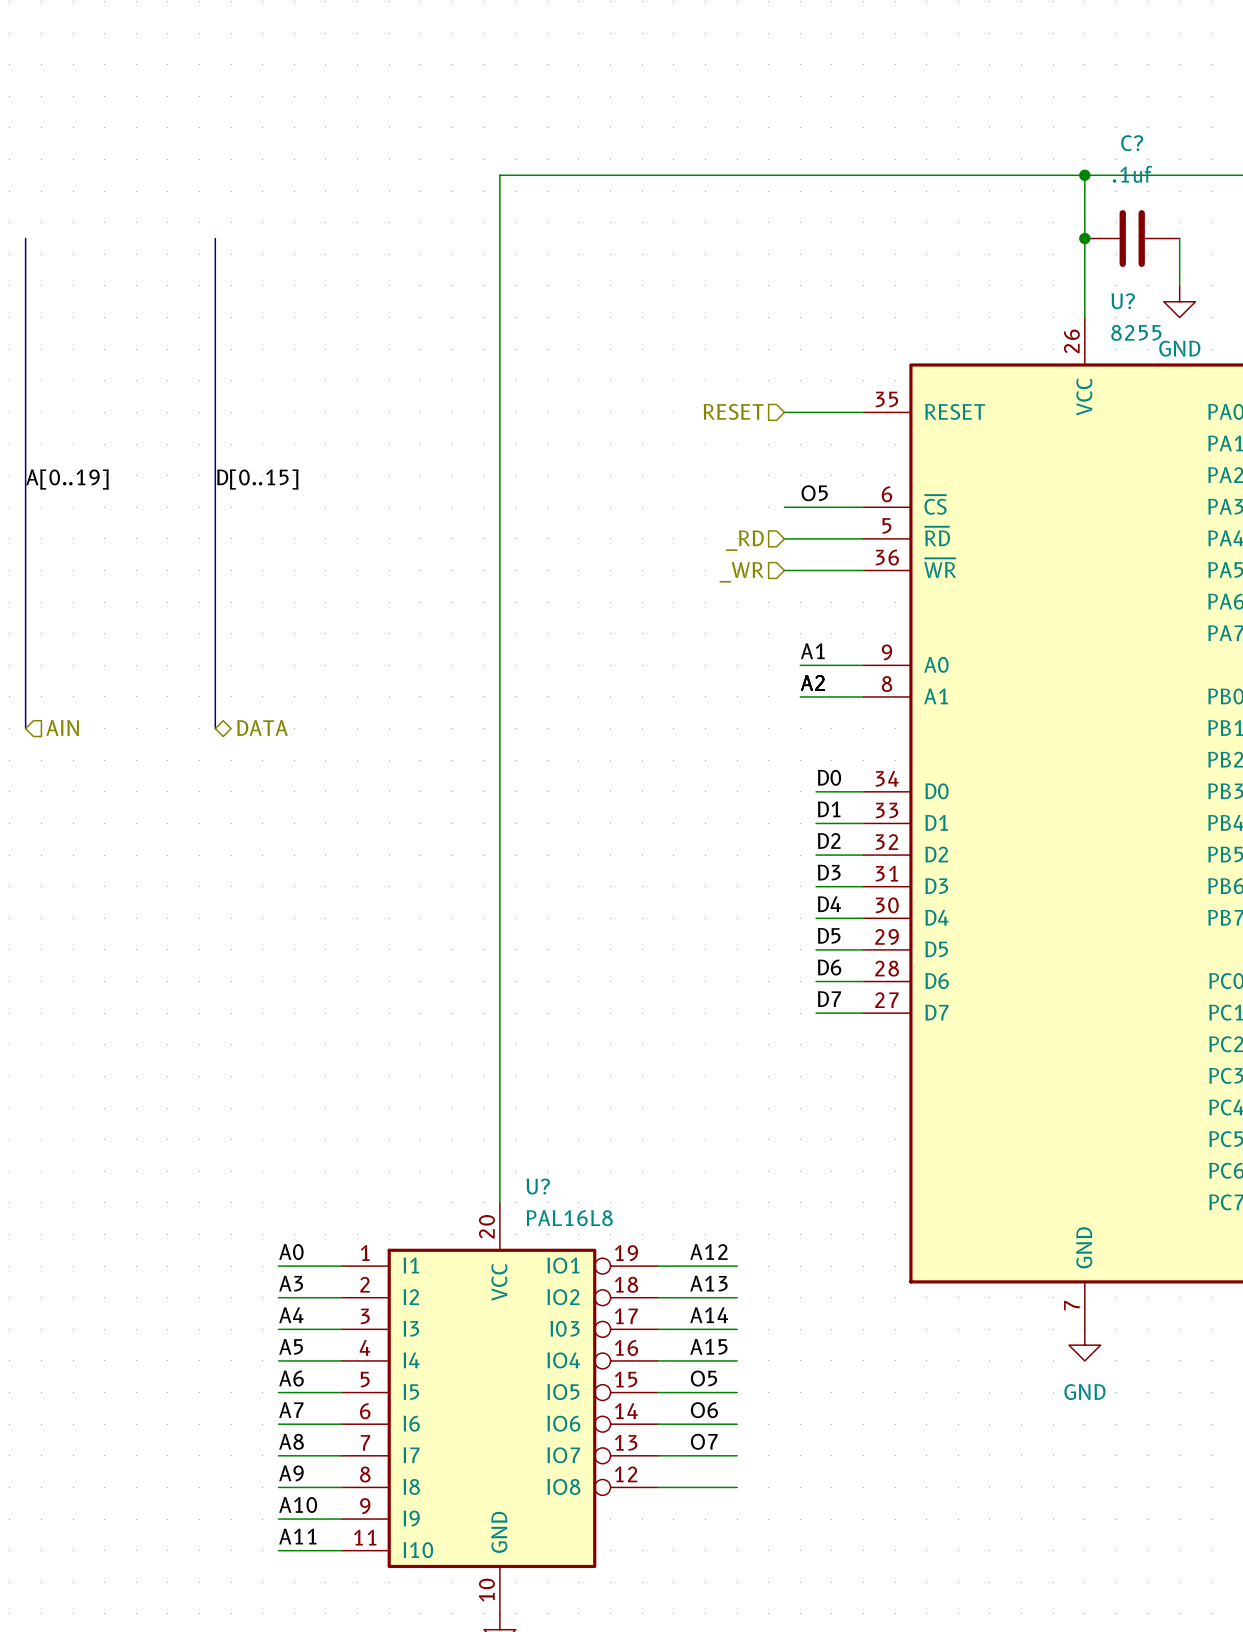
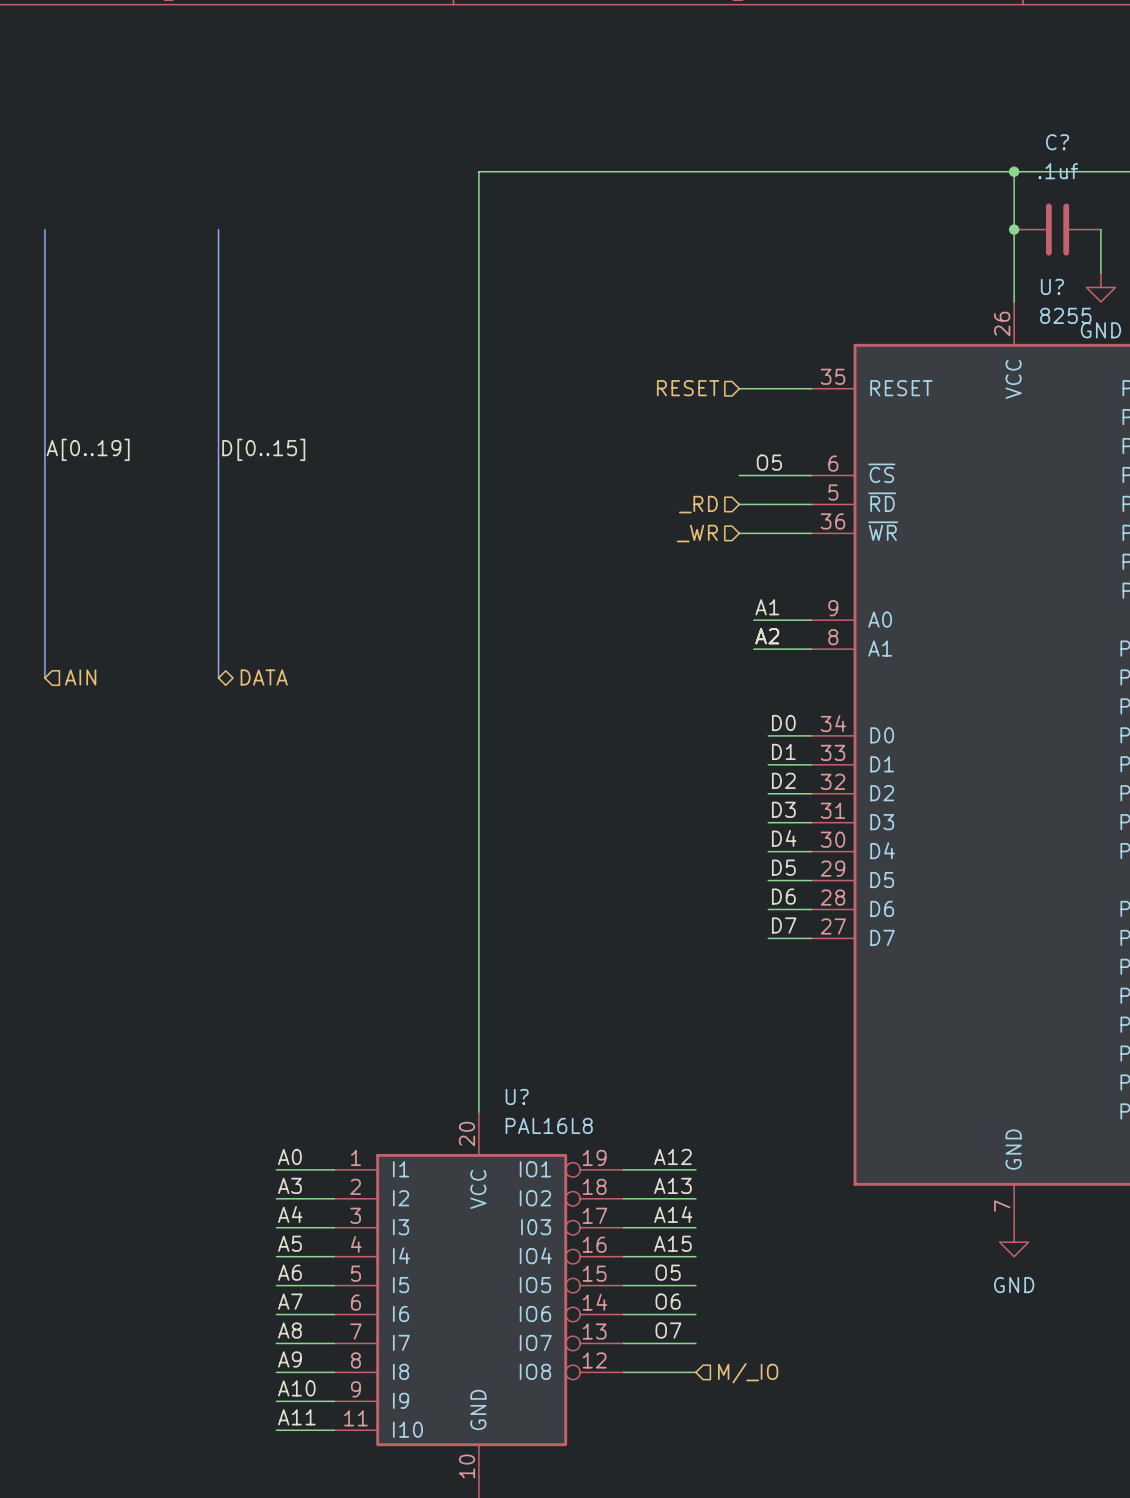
hierarchical label: none -> M/_IO (748, 1373)

